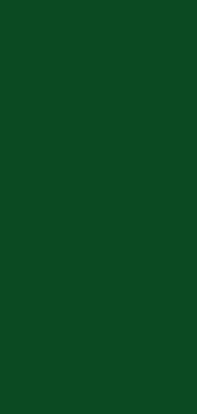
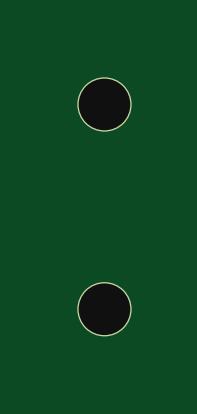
part: none -> (104, 104)
part: none -> (104, 309)

